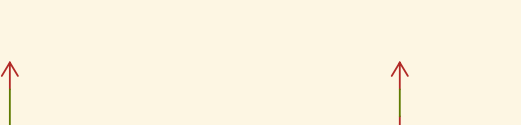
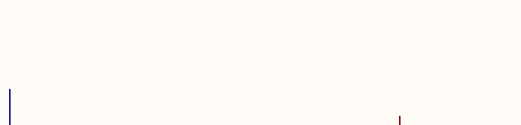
power symbol: (9, 75) -> none
power symbol: (399, 75) -> none
wire: (399, 89) (399, 116) -> none

